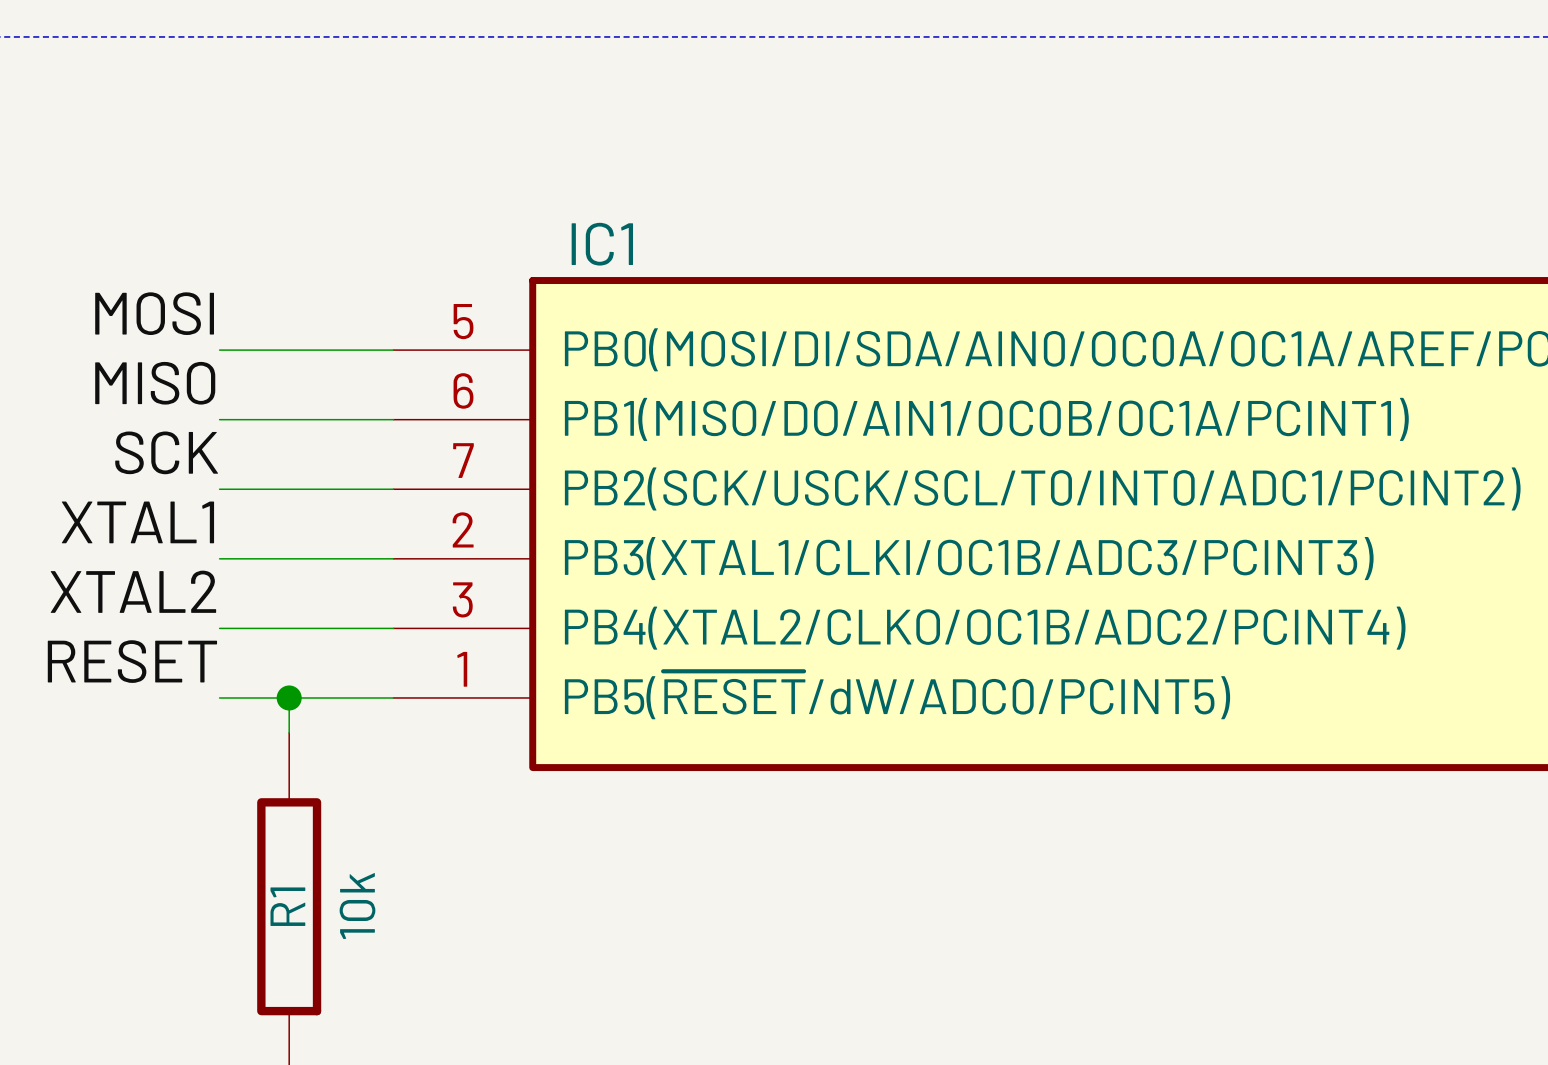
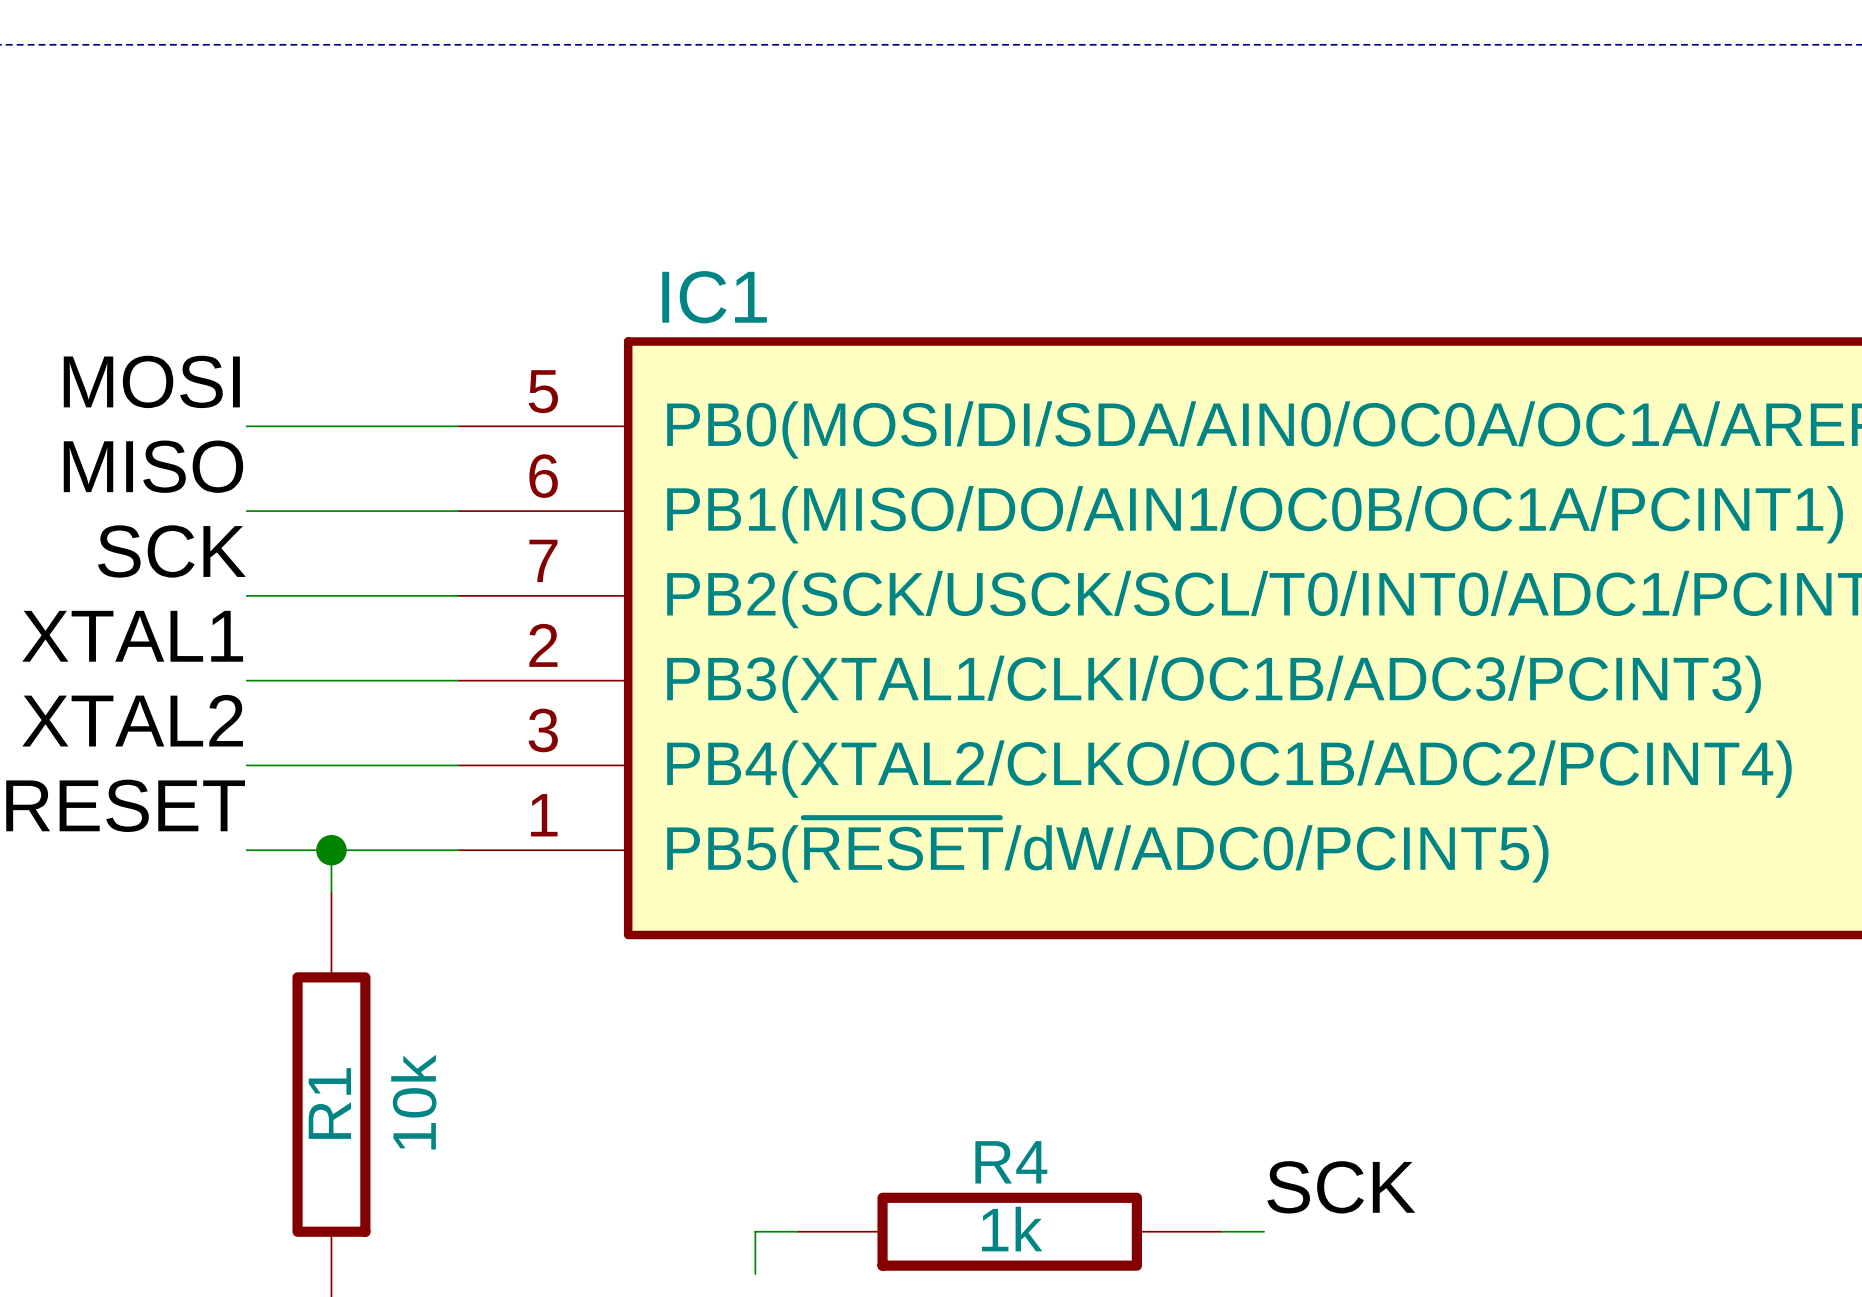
label: none -> SCK (1341, 1187)
wire: none -> (797, 1231) (755, 1231) (755, 1274)
R4: none -> 1k (1009, 1231)
wire: none -> (1221, 1231) (1264, 1231)

